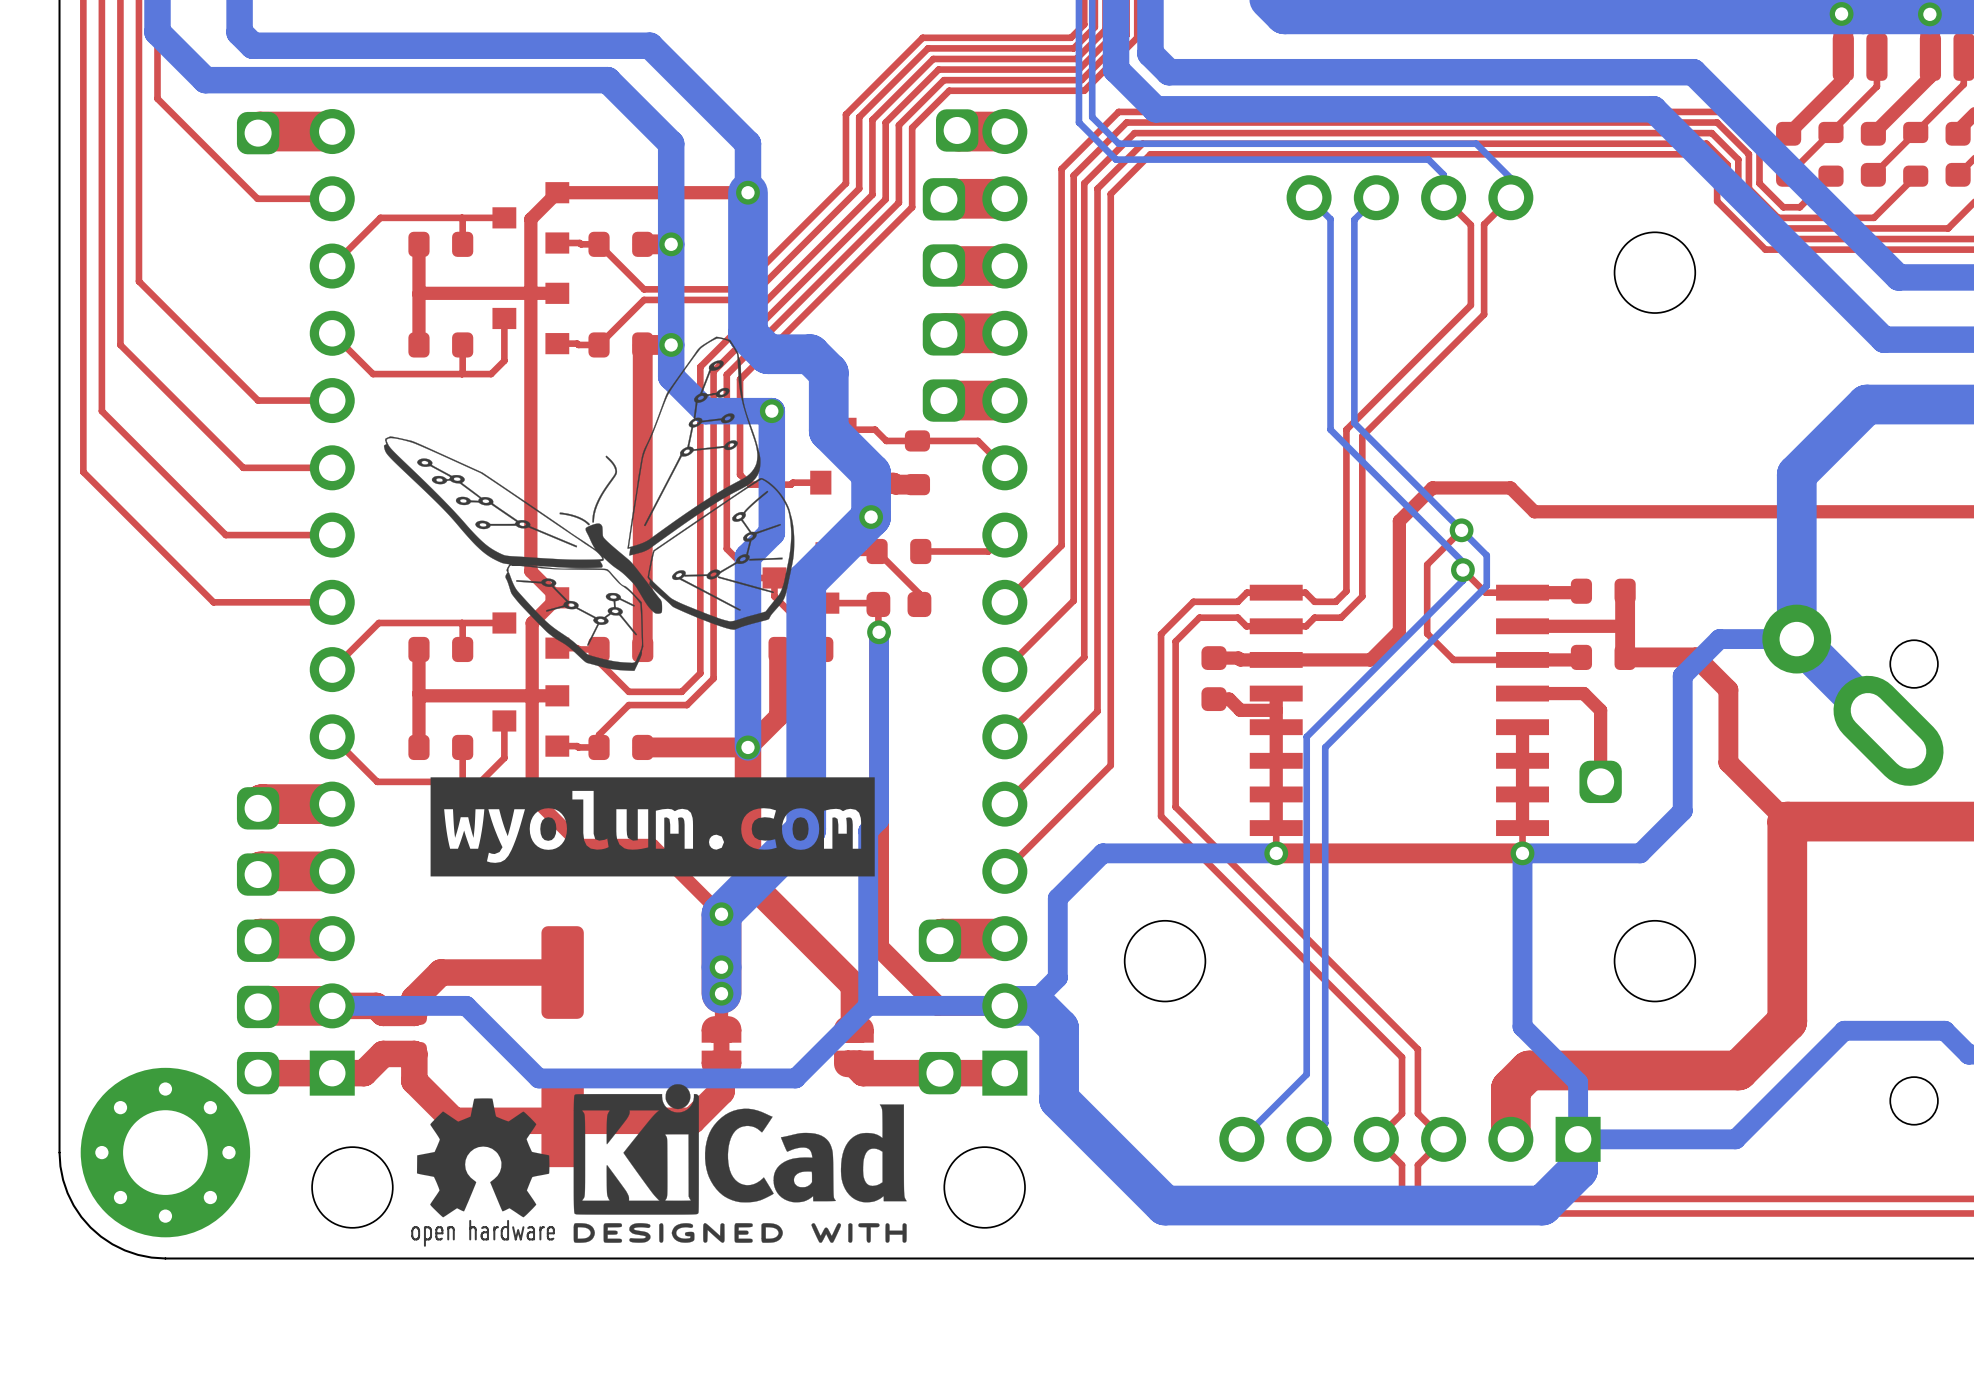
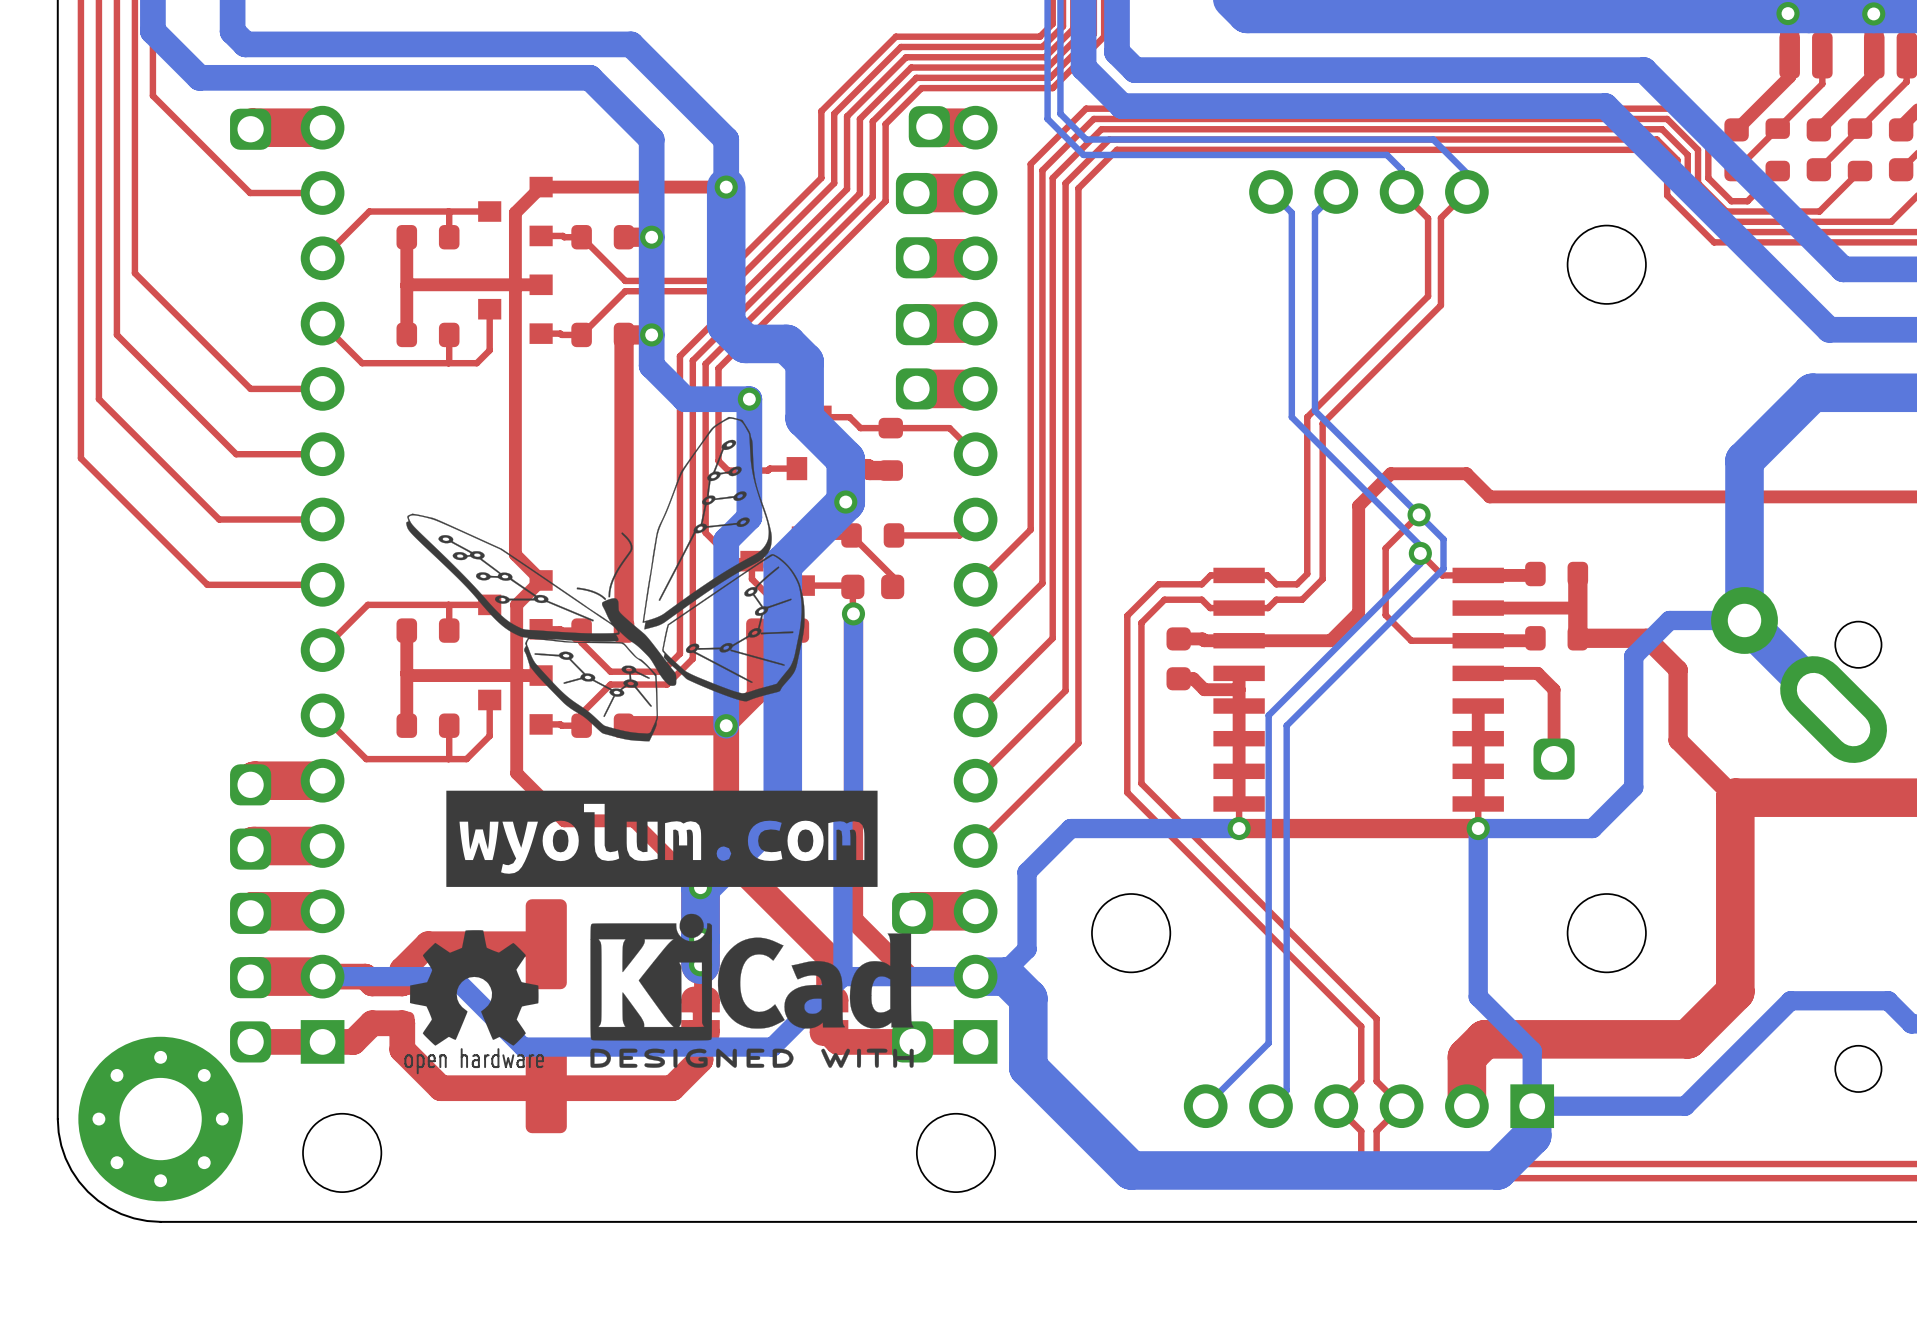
drawing position: (589, 503) -> (605, 579)
drawing position: (652, 826) -> (661, 838)
drawing position: (740, 1163) -> (752, 990)
drawing position: (483, 1172) -> (474, 1002)

